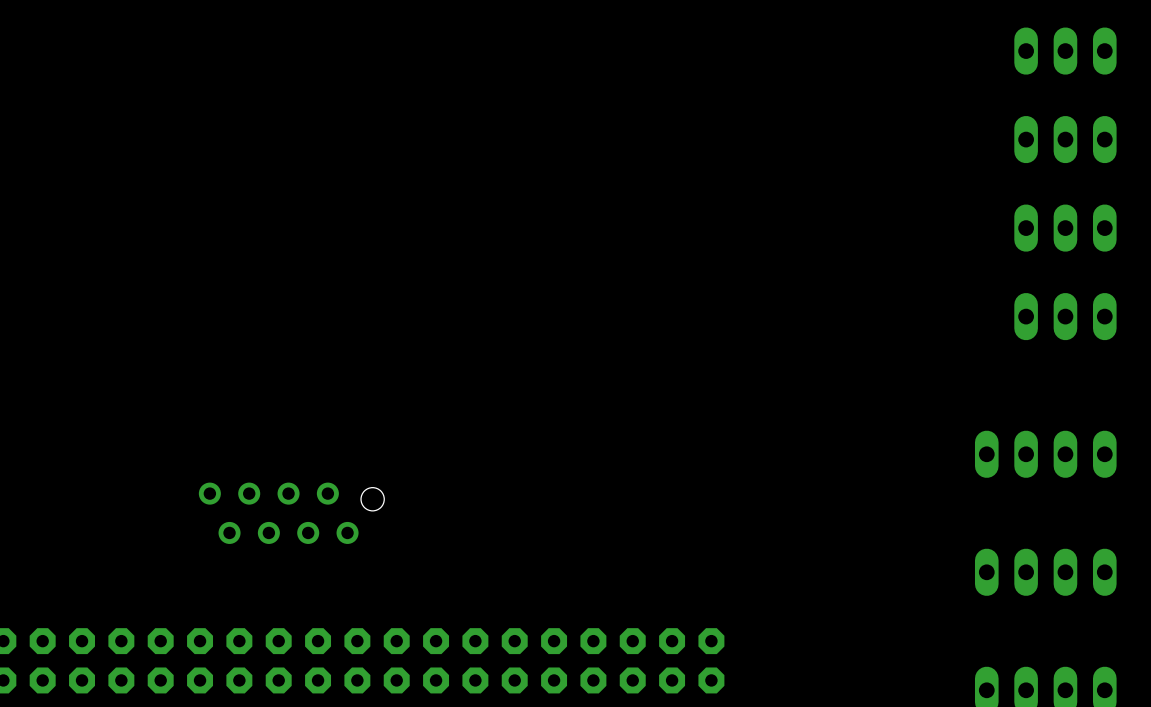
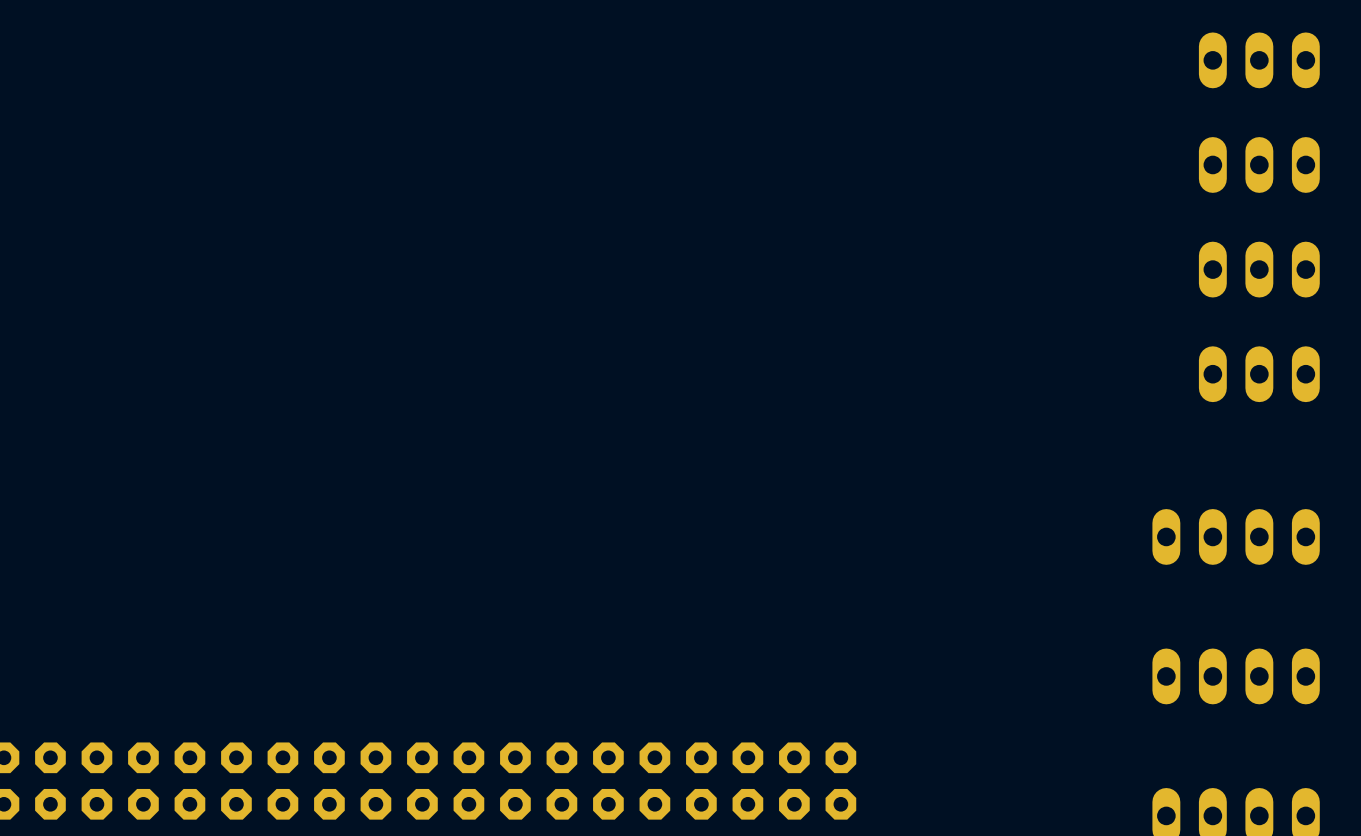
part: (291, 513) -> none

